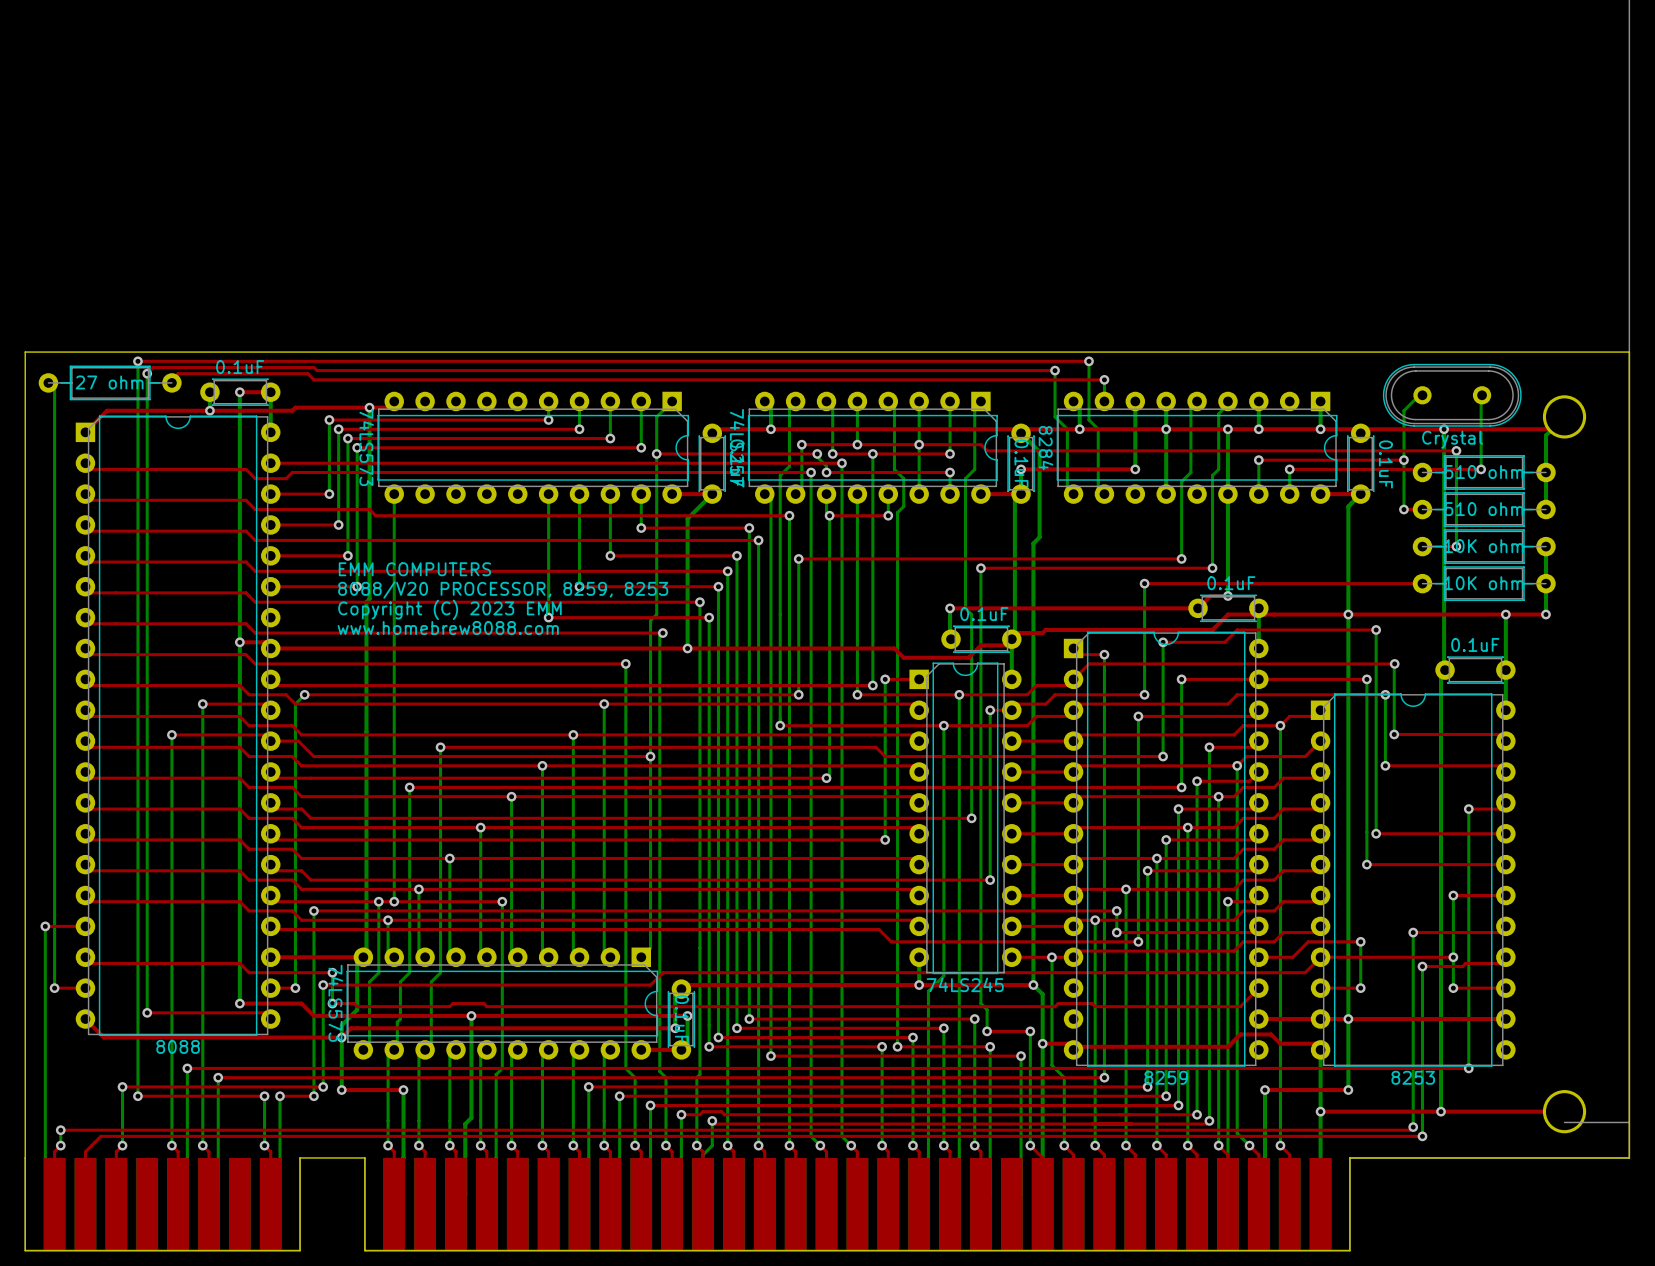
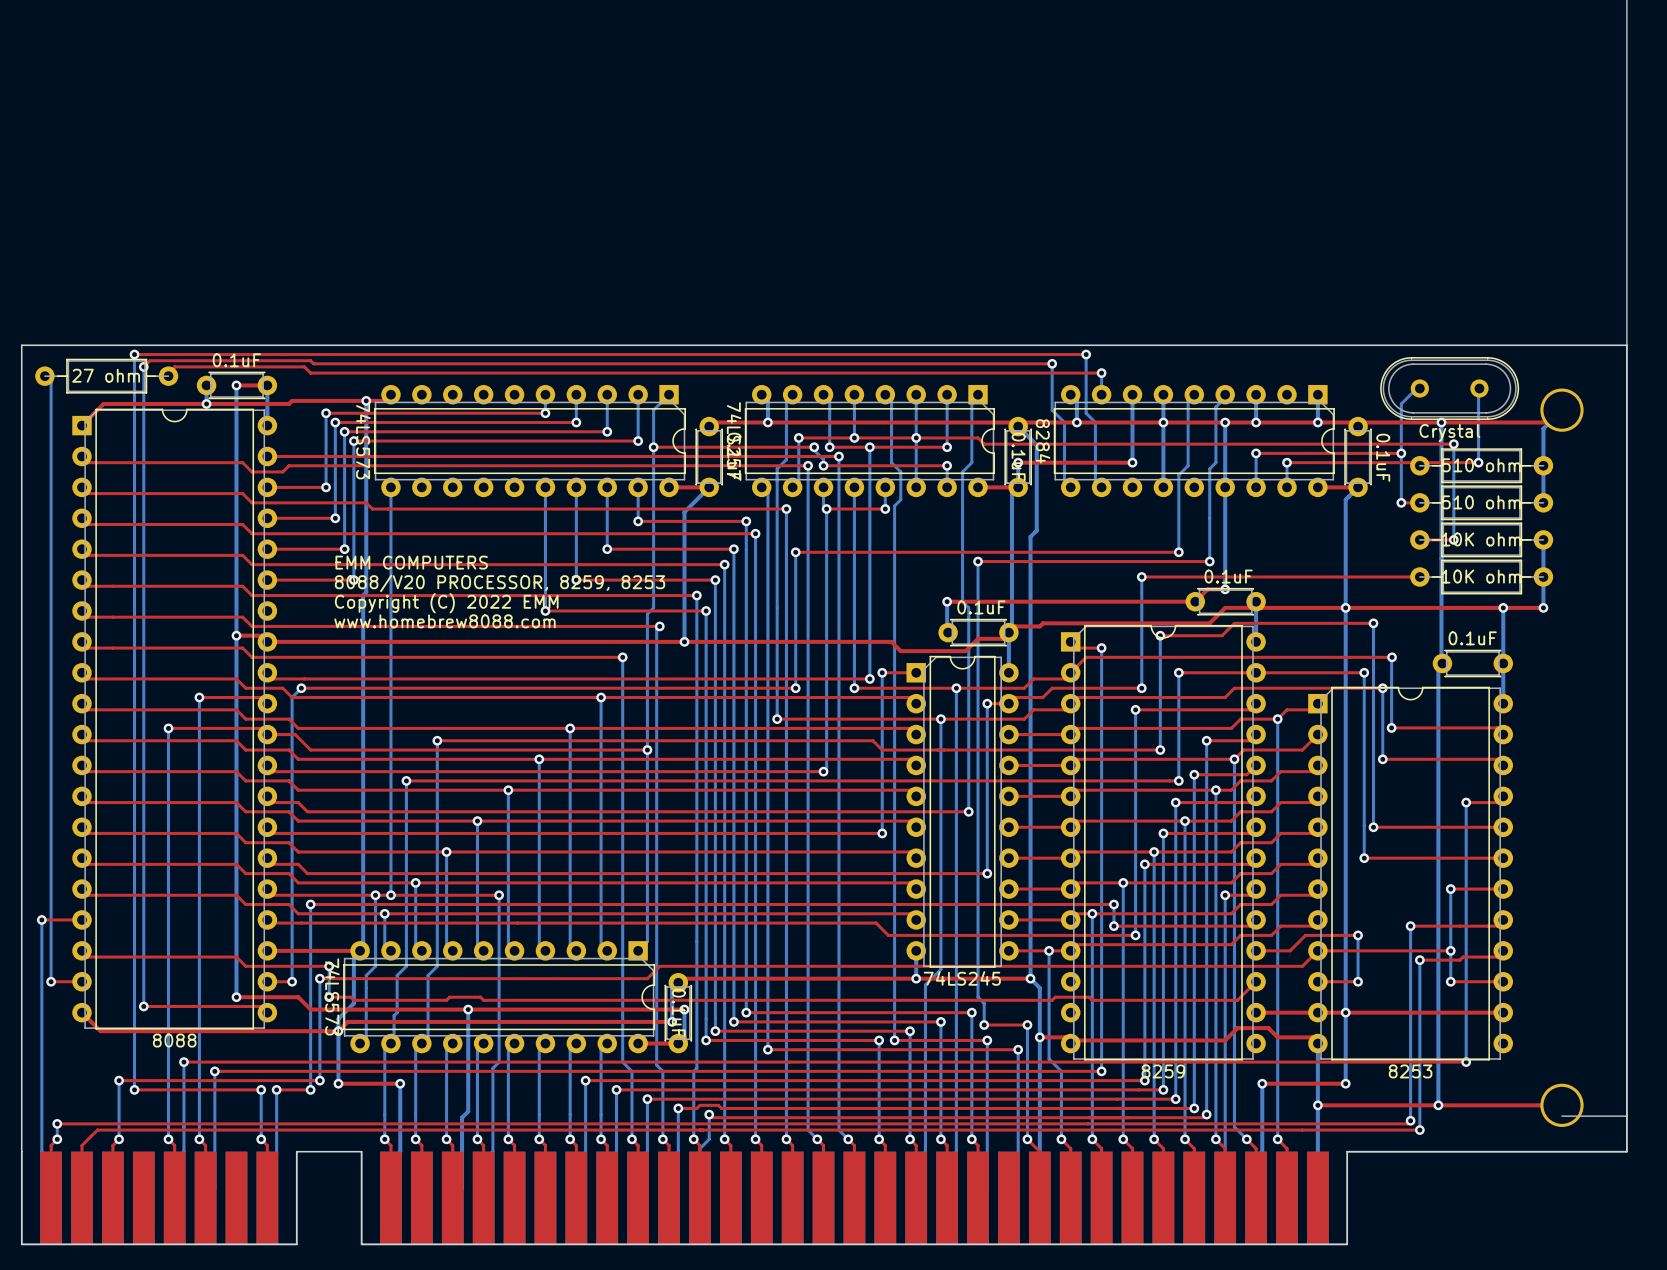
text: Copyright (C) 2023 EMM (449, 609) -> Copyright (C) 2022 EMM (446, 603)

